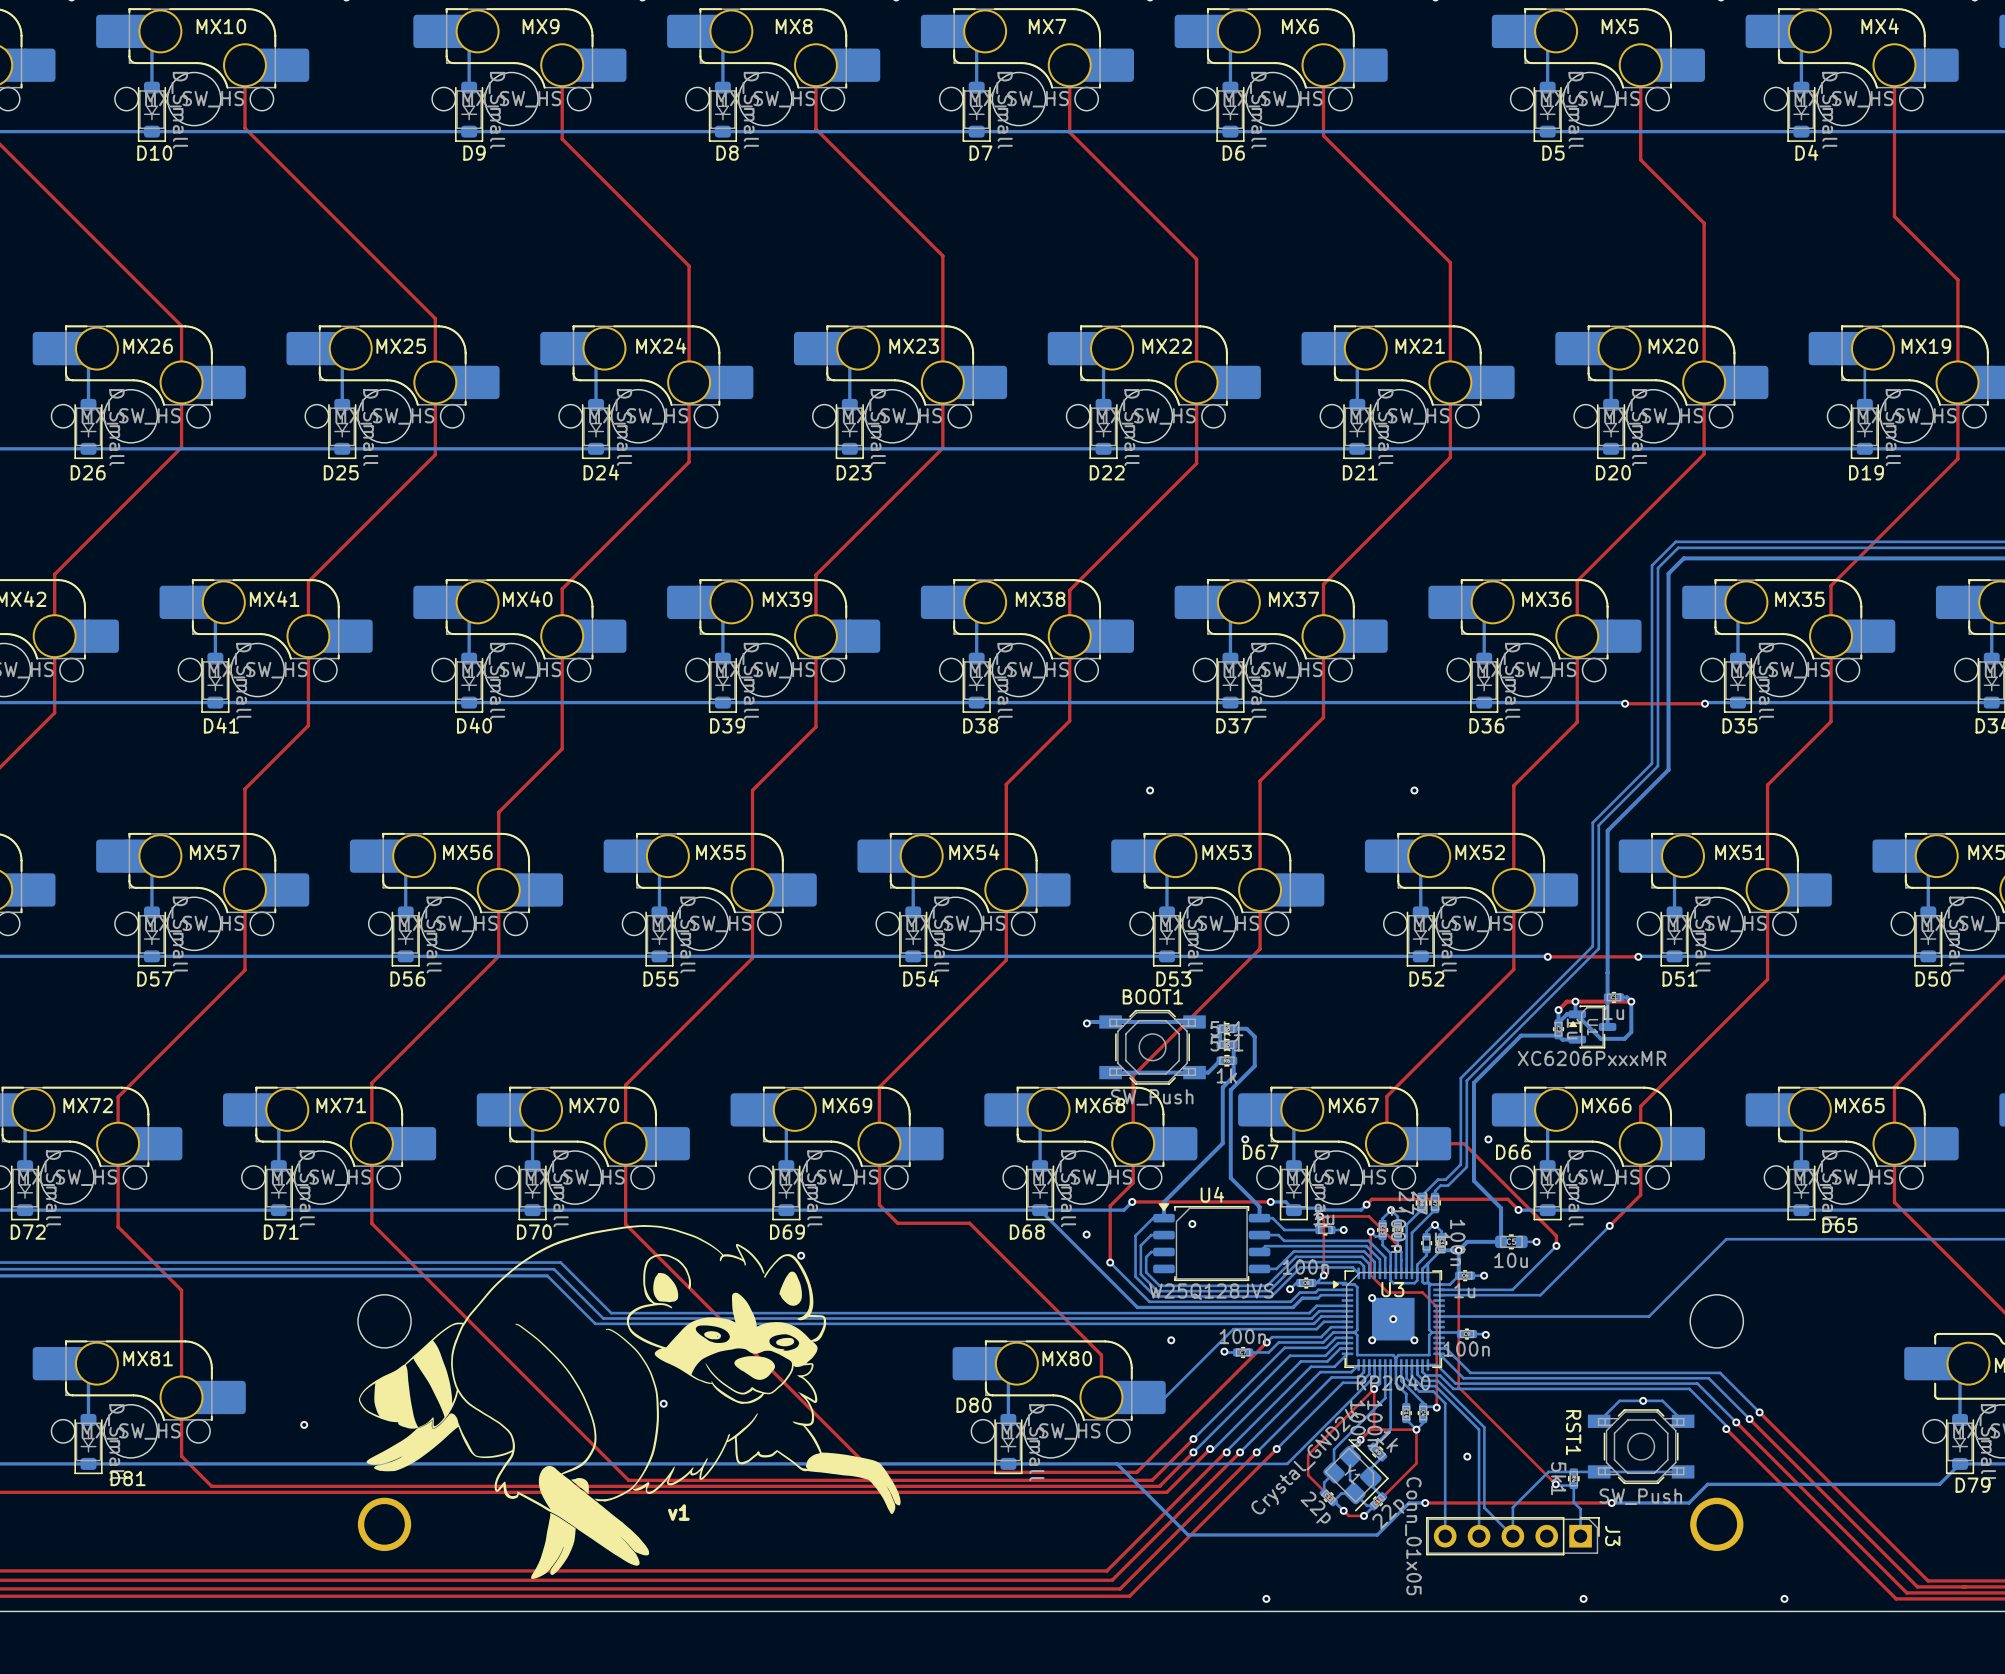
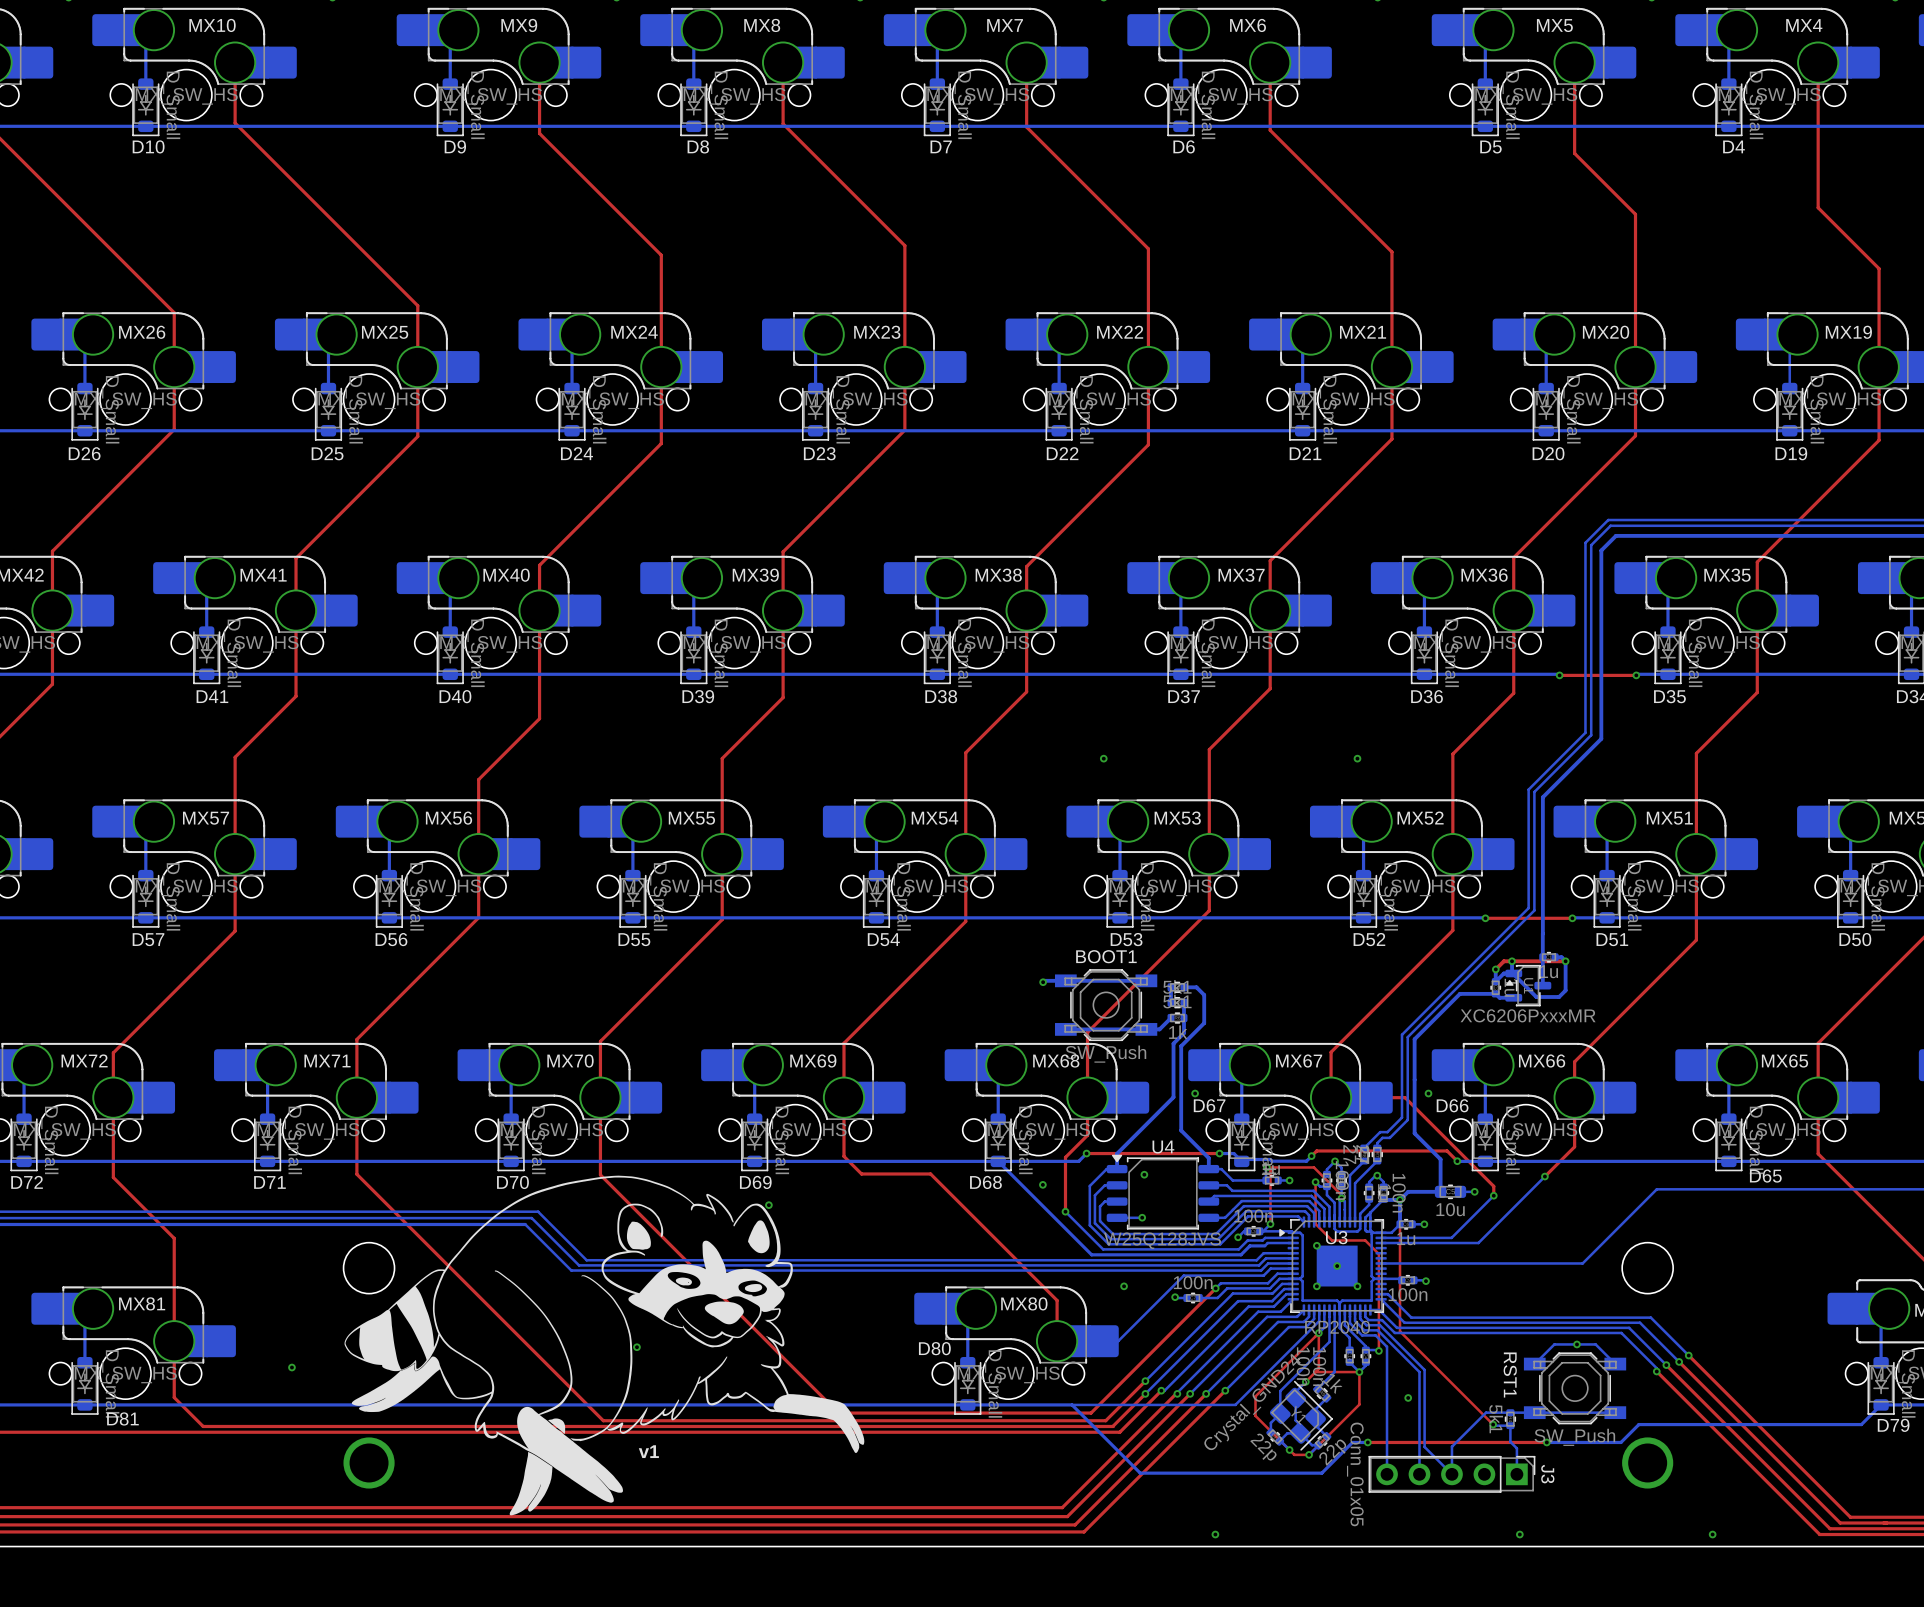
bottom track: none -> (1142, 1217) (1117, 1217)
via: none -> (1142, 1217)

